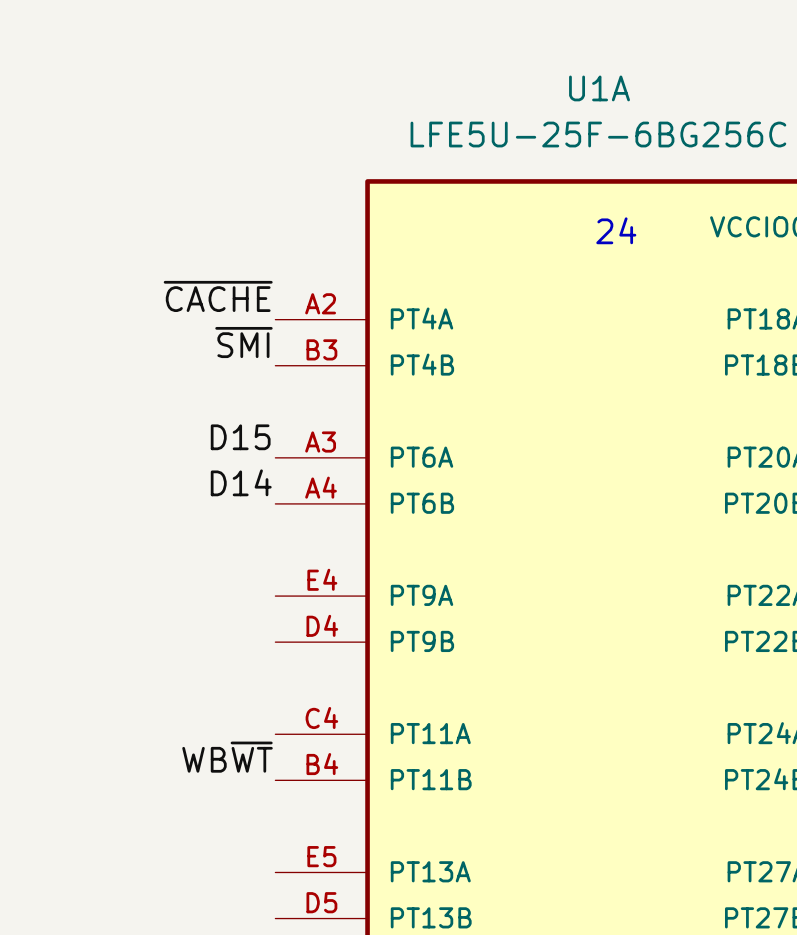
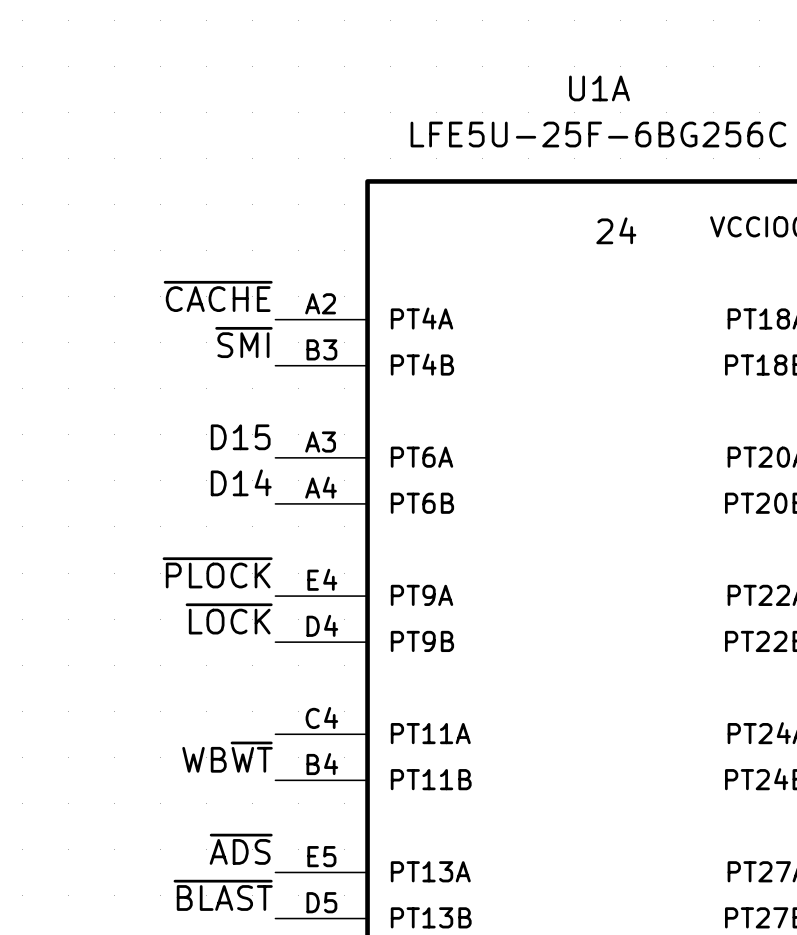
label: none -> ~{PLOCK} (217, 572)
label: none -> ~{LOCK} (229, 618)
label: none -> ~{ADS} (241, 849)
label: none -> ~{BLAST} (223, 895)

